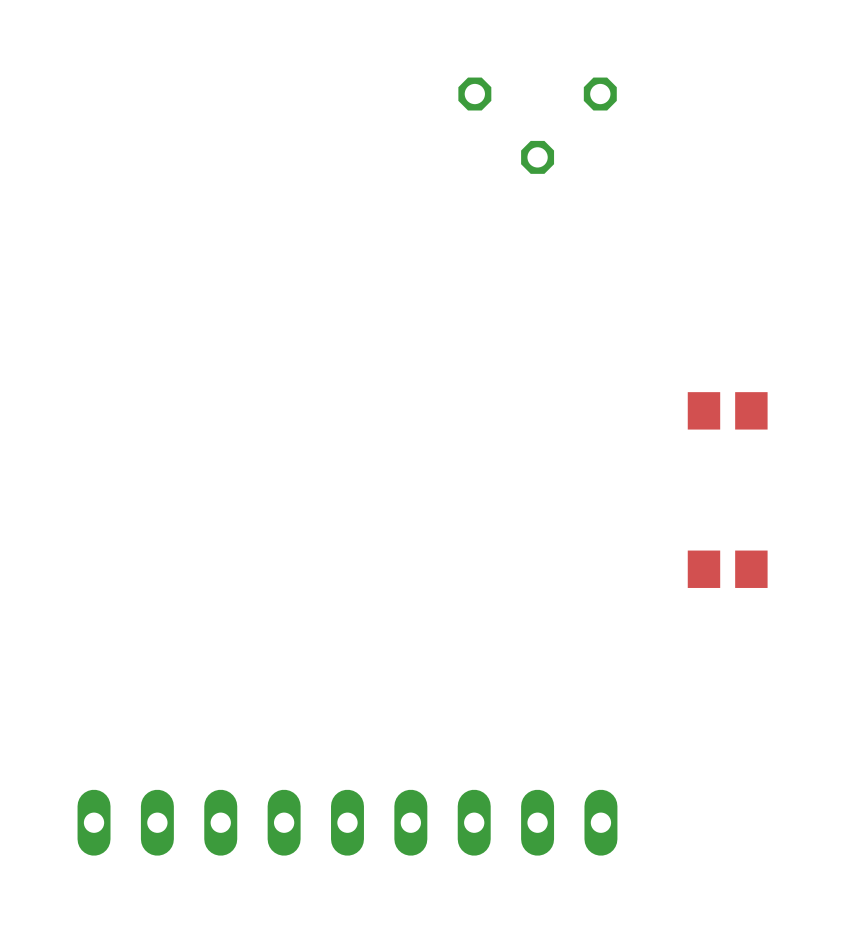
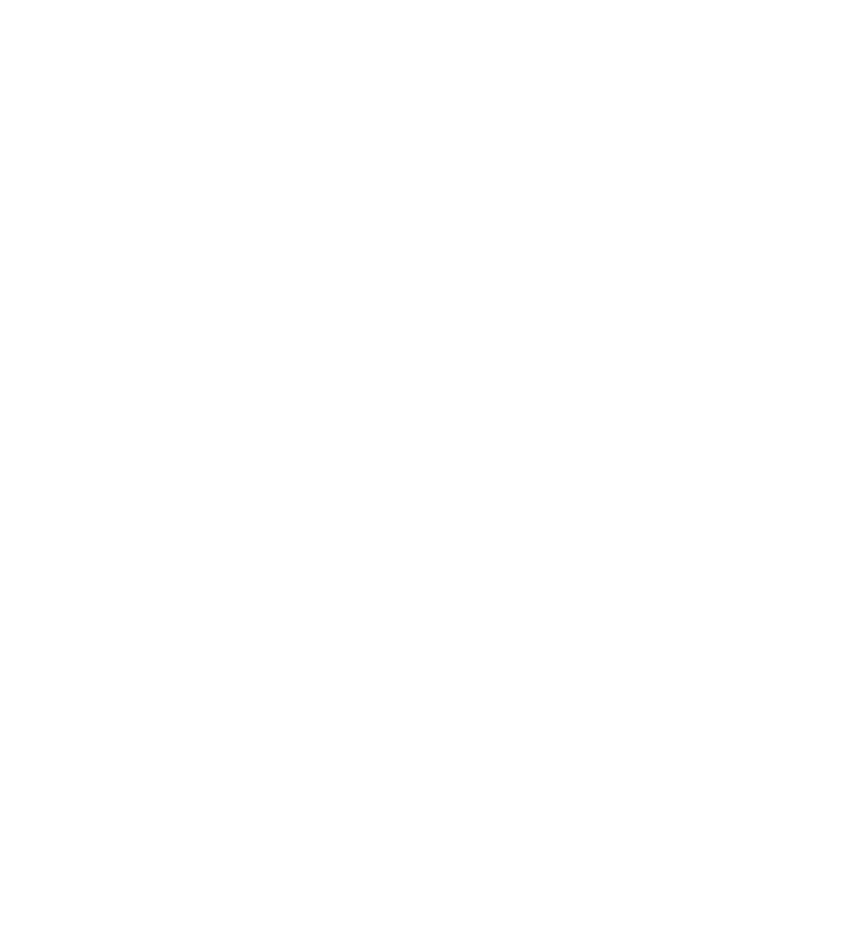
part: (537, 125) -> none
part: (727, 410) -> none
part: (727, 569) -> none
part: (347, 822) -> none

